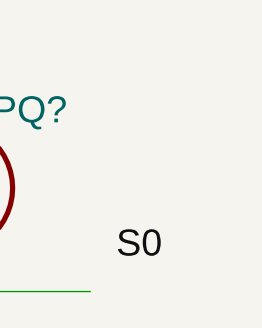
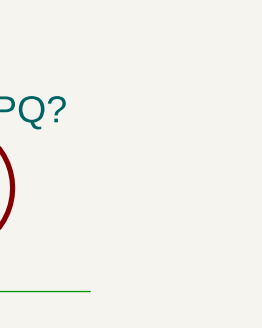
label: S0 (139, 242) -> none

